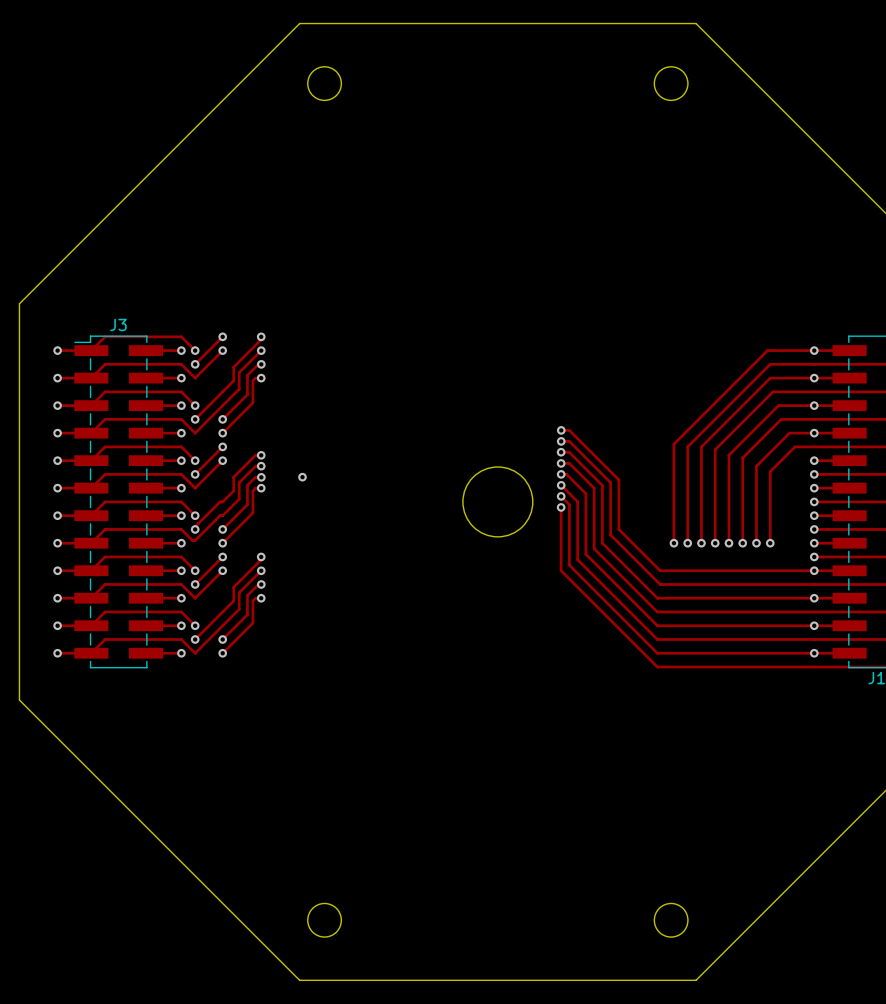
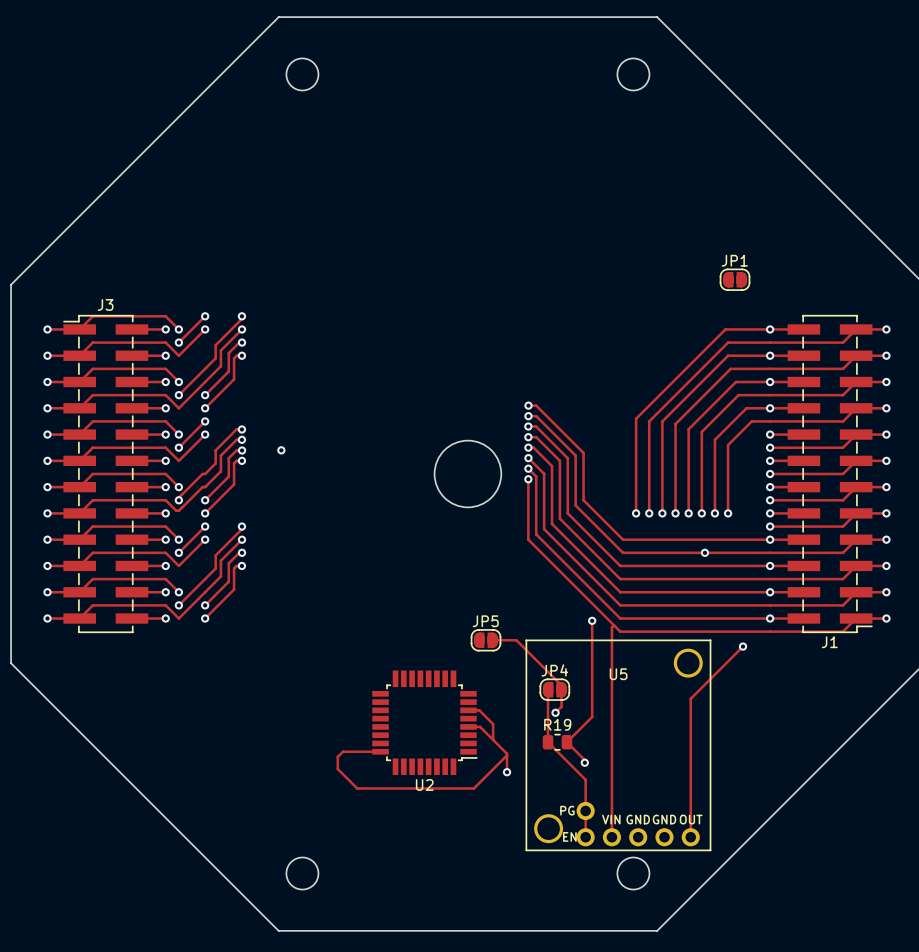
JP1: none -> (735, 279)
via: none -> (704, 552)
track: none -> (592, 620) (592, 716) (566, 742) (584, 760) (584, 762)
via: none -> (592, 620)
track: none -> (613, 625) (611, 627) (611, 837)
JP5: none -> (486, 640)
track: none -> (492, 640) (516, 640) (561, 685) (561, 706) (555, 712)
track: none -> (743, 646) (690, 698) (690, 837)
via: none -> (743, 646)
track: none -> (548, 689) (548, 742) (585, 779) (585, 837)
JP4: none -> (554, 689)
track: none -> (468, 710) (479, 710) (493, 724) (493, 739)
via: none -> (555, 712)
U2: none -> (424, 722)
track: none -> (468, 726) (480, 726) (507, 753) (507, 772)
R19: none -> (557, 742)
U5: none -> (618, 745)
track: none -> (380, 751) (342, 751) (337, 756) (337, 769) (357, 788) (473, 788) (507, 755)
via: none -> (584, 762)
via: none -> (507, 772)

